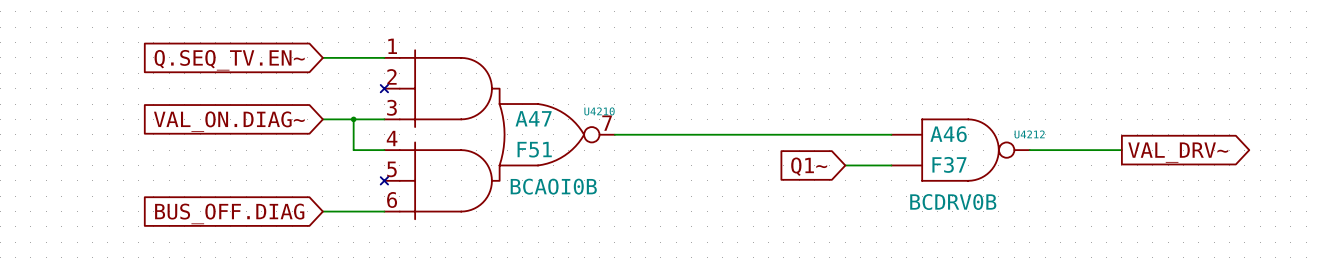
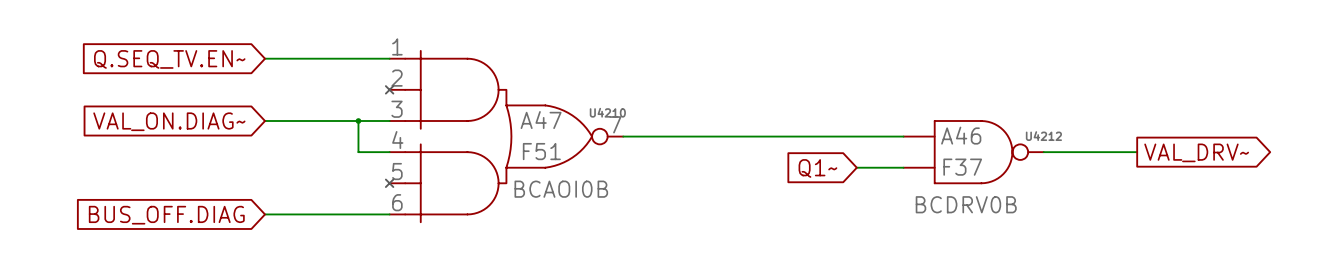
wire: none -> (265, 58) (327, 58)
global label position: Q.SEQ_TV.EN~ (229, 60) -> Q.SEQ_TV.EN~ (169, 59)
wire: none -> (265, 121) (327, 121)
global label position: VAL_ON.DIAG~ (229, 121) -> VAL_ON.DIAG~ (169, 121)
wire: none -> (265, 214) (327, 214)
global label position: BUS_OFF.DIAG (229, 213) -> BUS_OFF.DIAG (166, 215)

